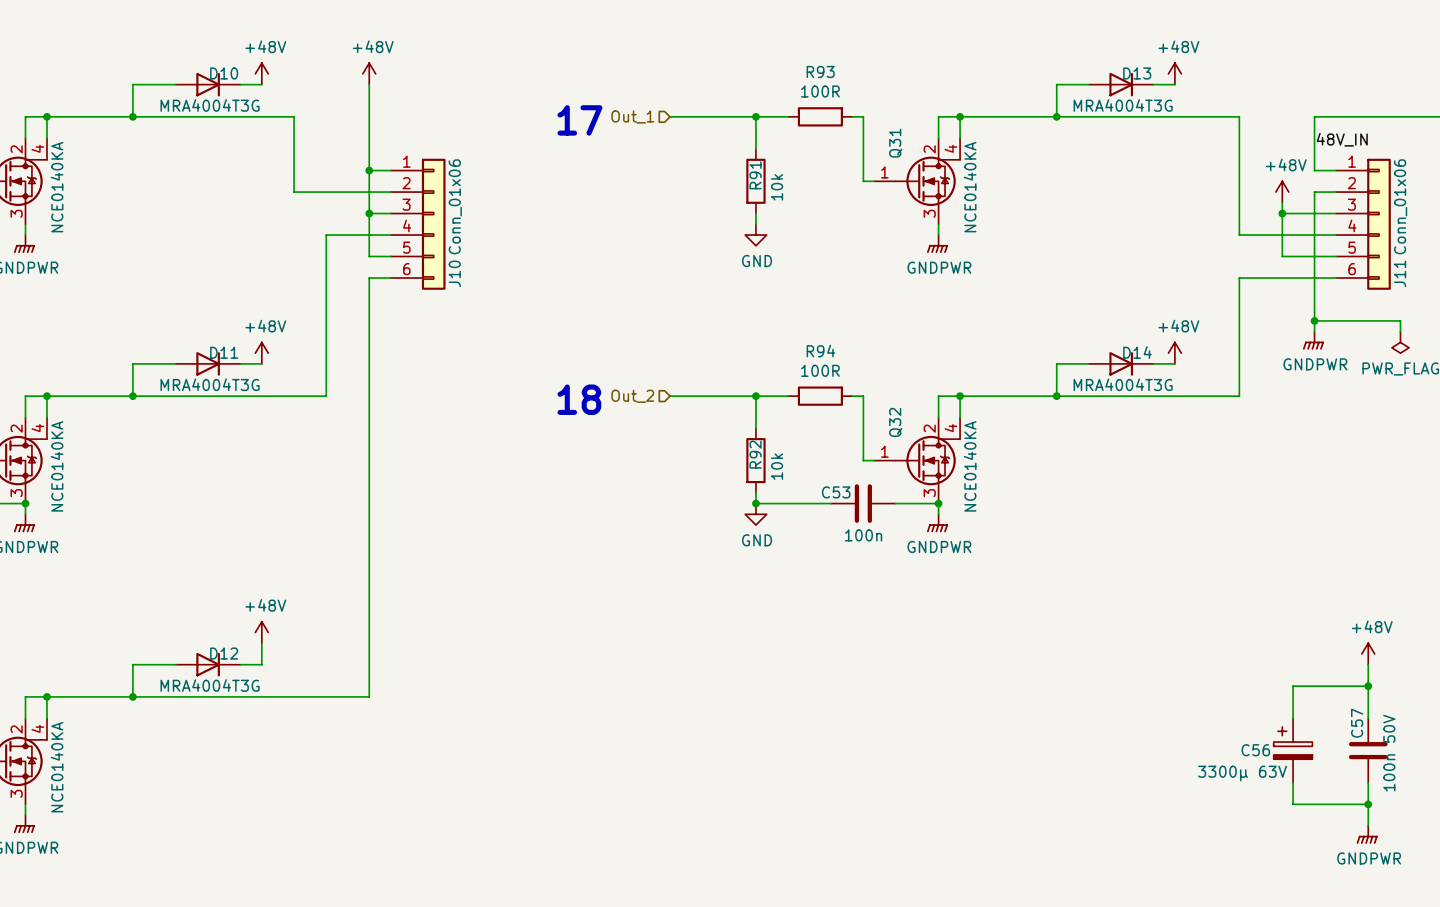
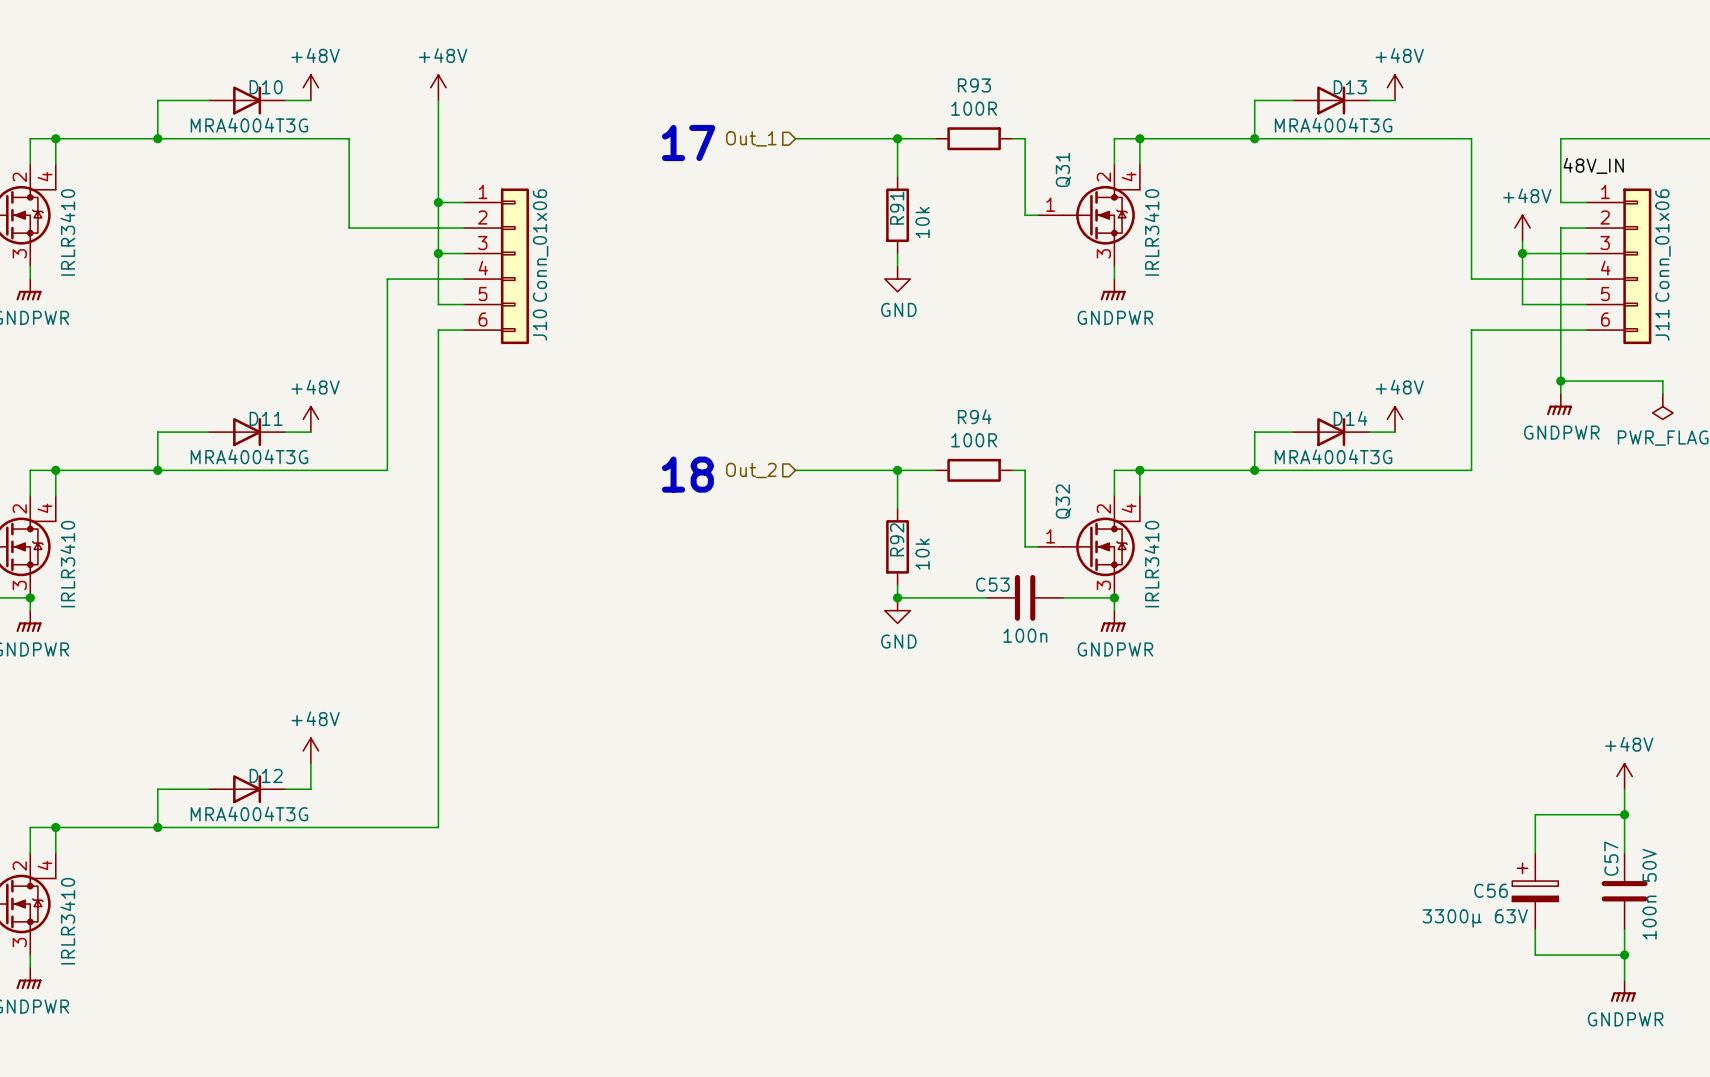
part value: NCE0140KA (57, 187) -> IRLR3410 (67, 232)
Q31 value: NCE0140KA (970, 187) -> IRLR3410 (1151, 232)
part value: NCE0140KA (57, 466) -> IRLR3410 (67, 564)
Q32 value: NCE0140KA (970, 466) -> IRLR3410 (1151, 564)
part value: NCE0140KA (57, 767) -> IRLR3410 (67, 921)

